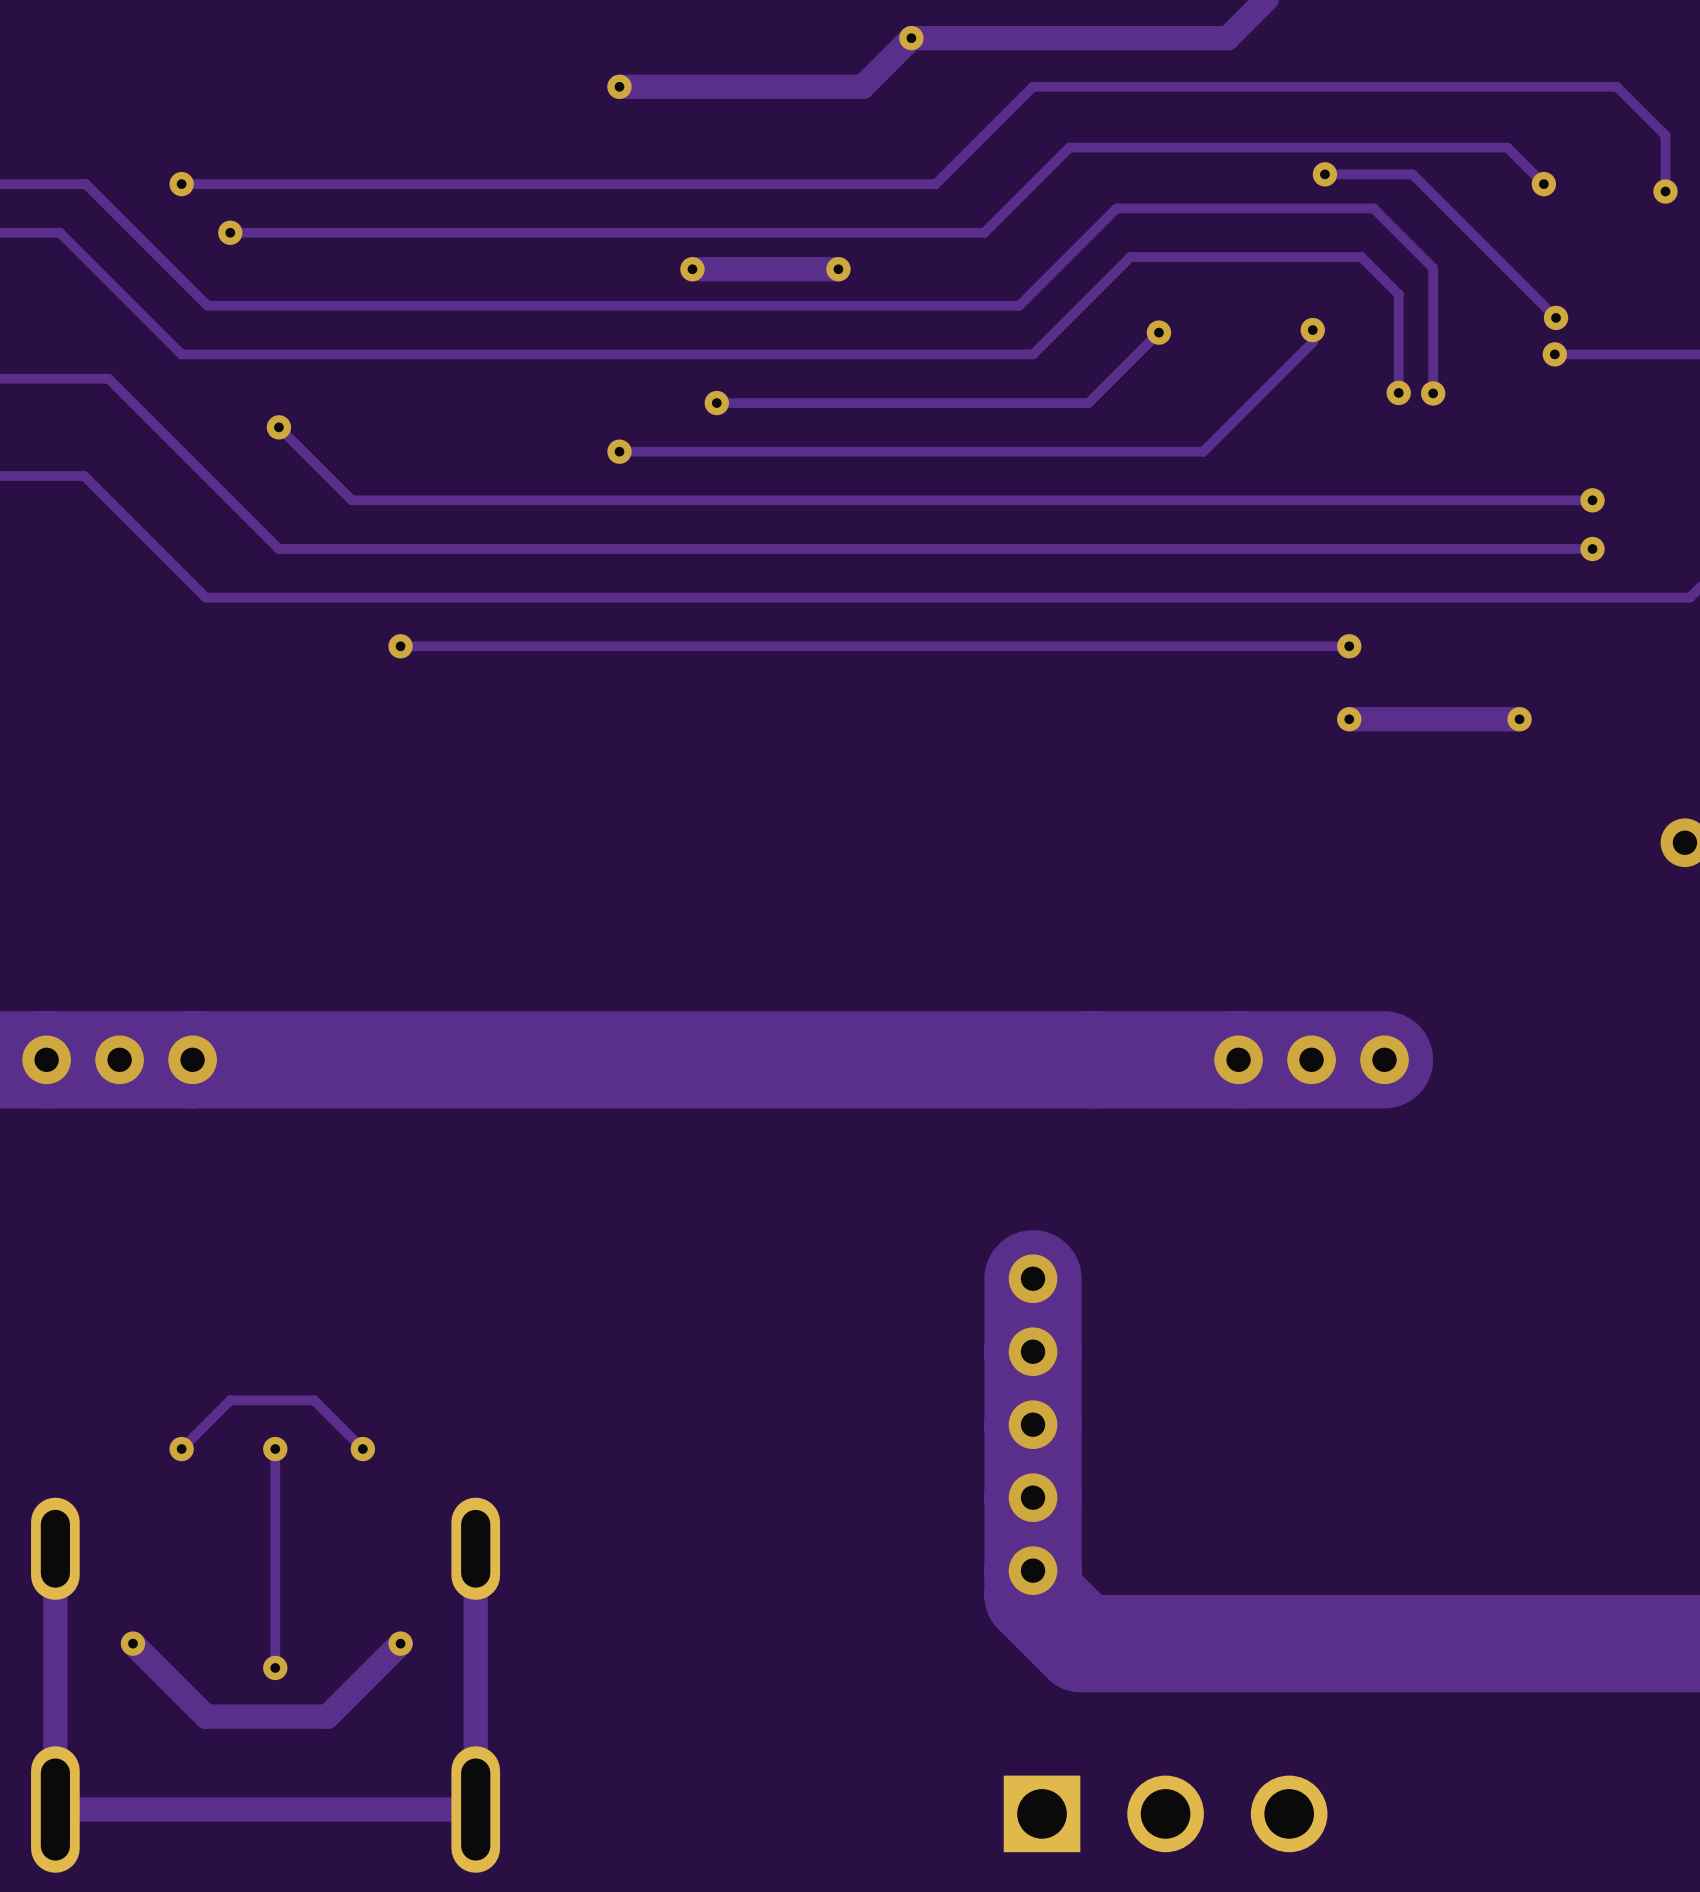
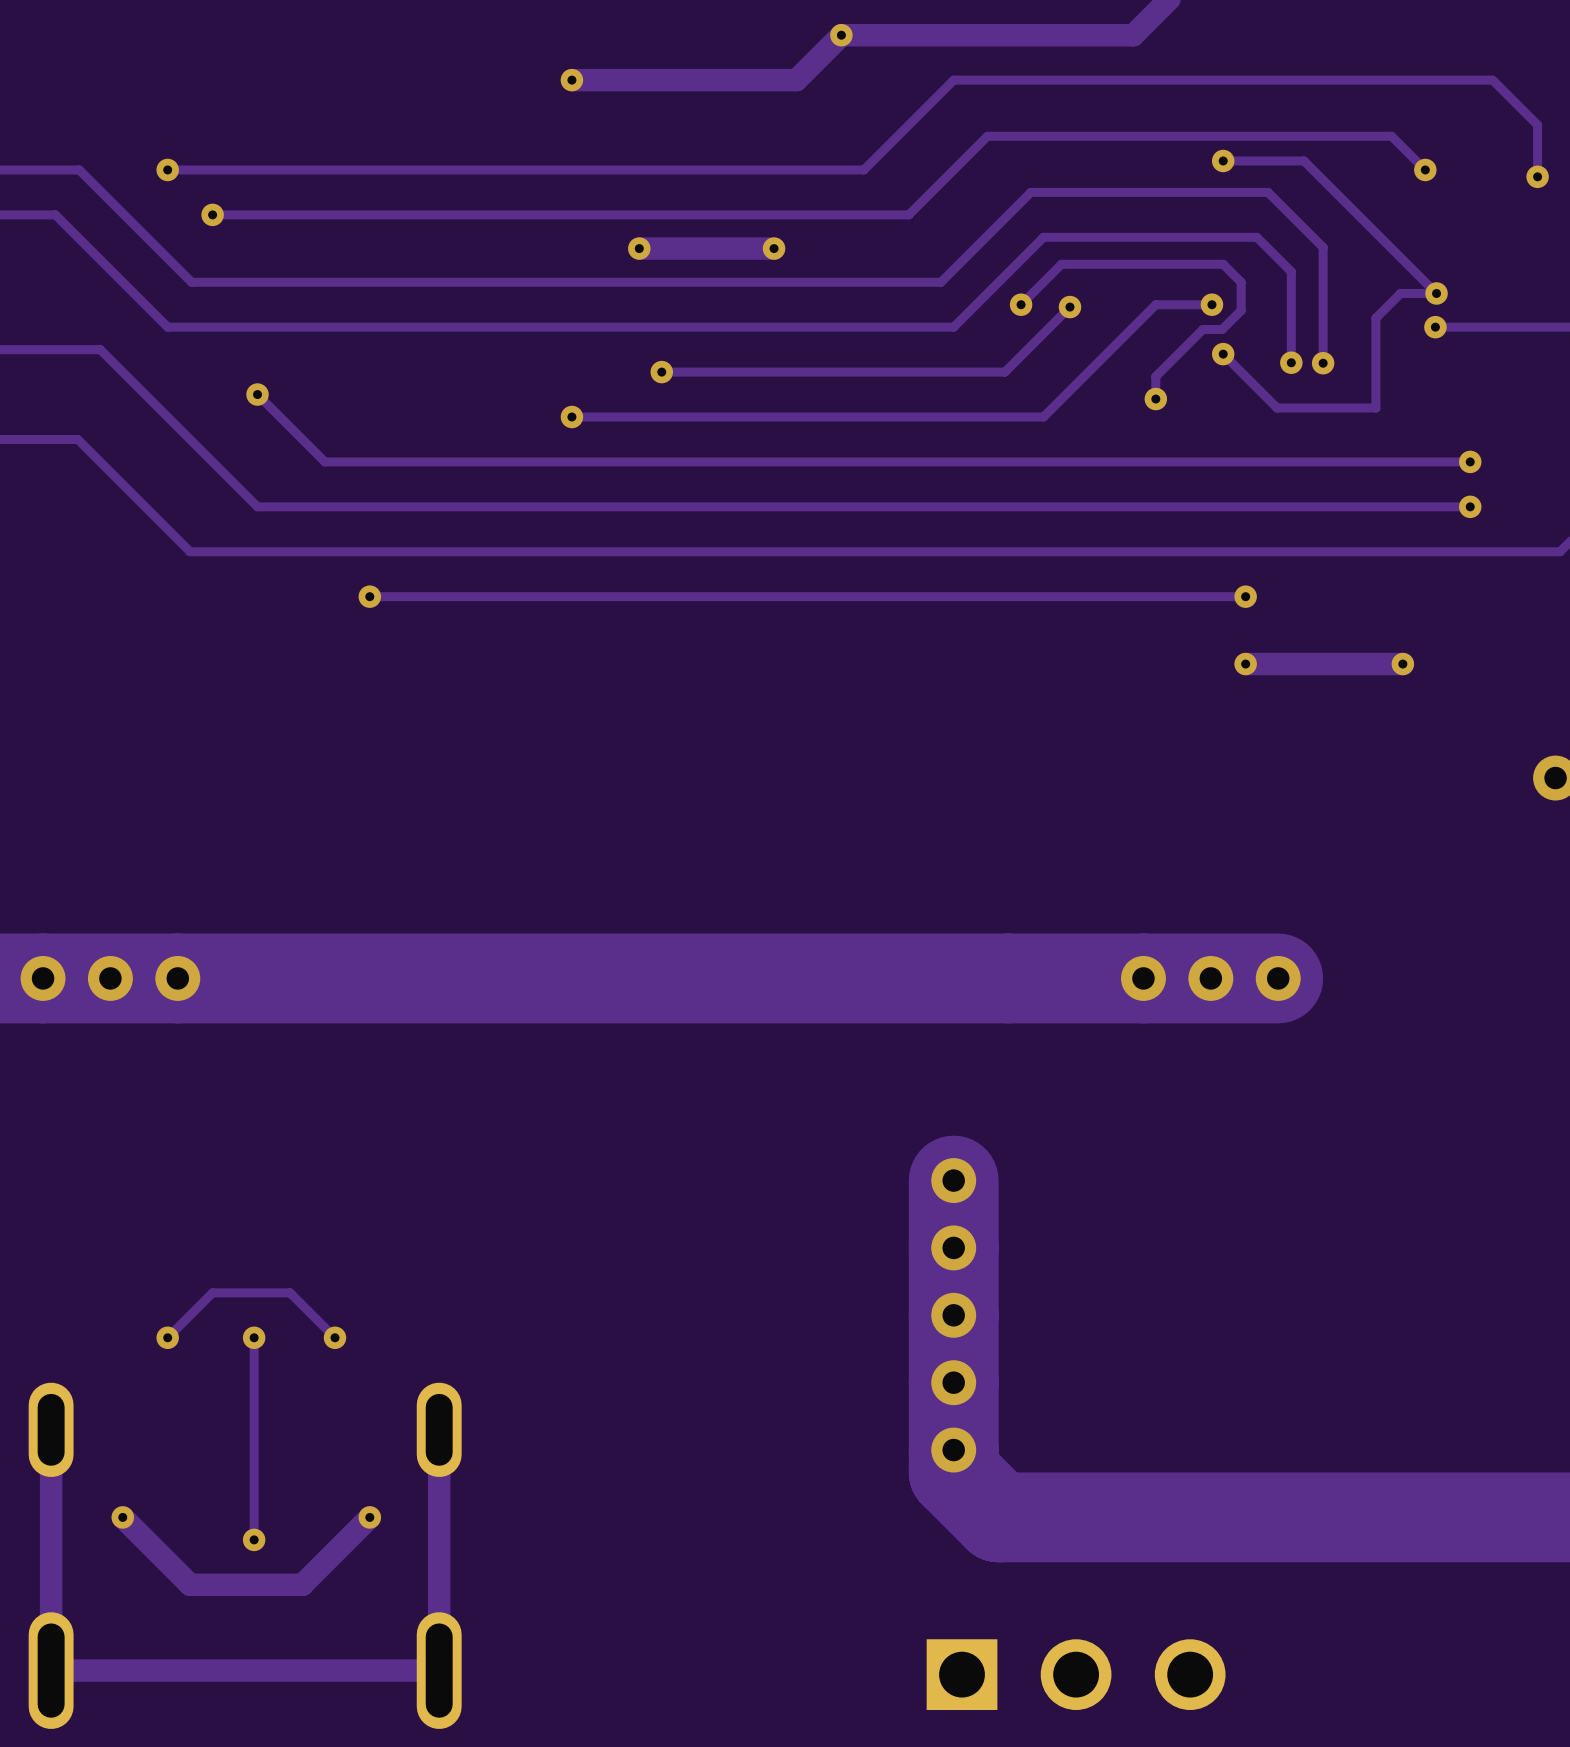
track: none -> (1436, 293) (1400, 293) (1375, 318) (1375, 408) (1277, 408) (1223, 354)
track: none -> (1021, 304) (1061, 264) (1223, 264) (1241, 282) (1241, 310) (1222, 329) (1202, 329) (1155, 376) (1155, 399)
via: none -> (1021, 304)
track: (1312, 330) (1312, 342) (1203, 451) (1130, 451) -> (1211, 304) (1155, 304) (1043, 417)
via: none -> (1223, 354)
via: none -> (1155, 399)

